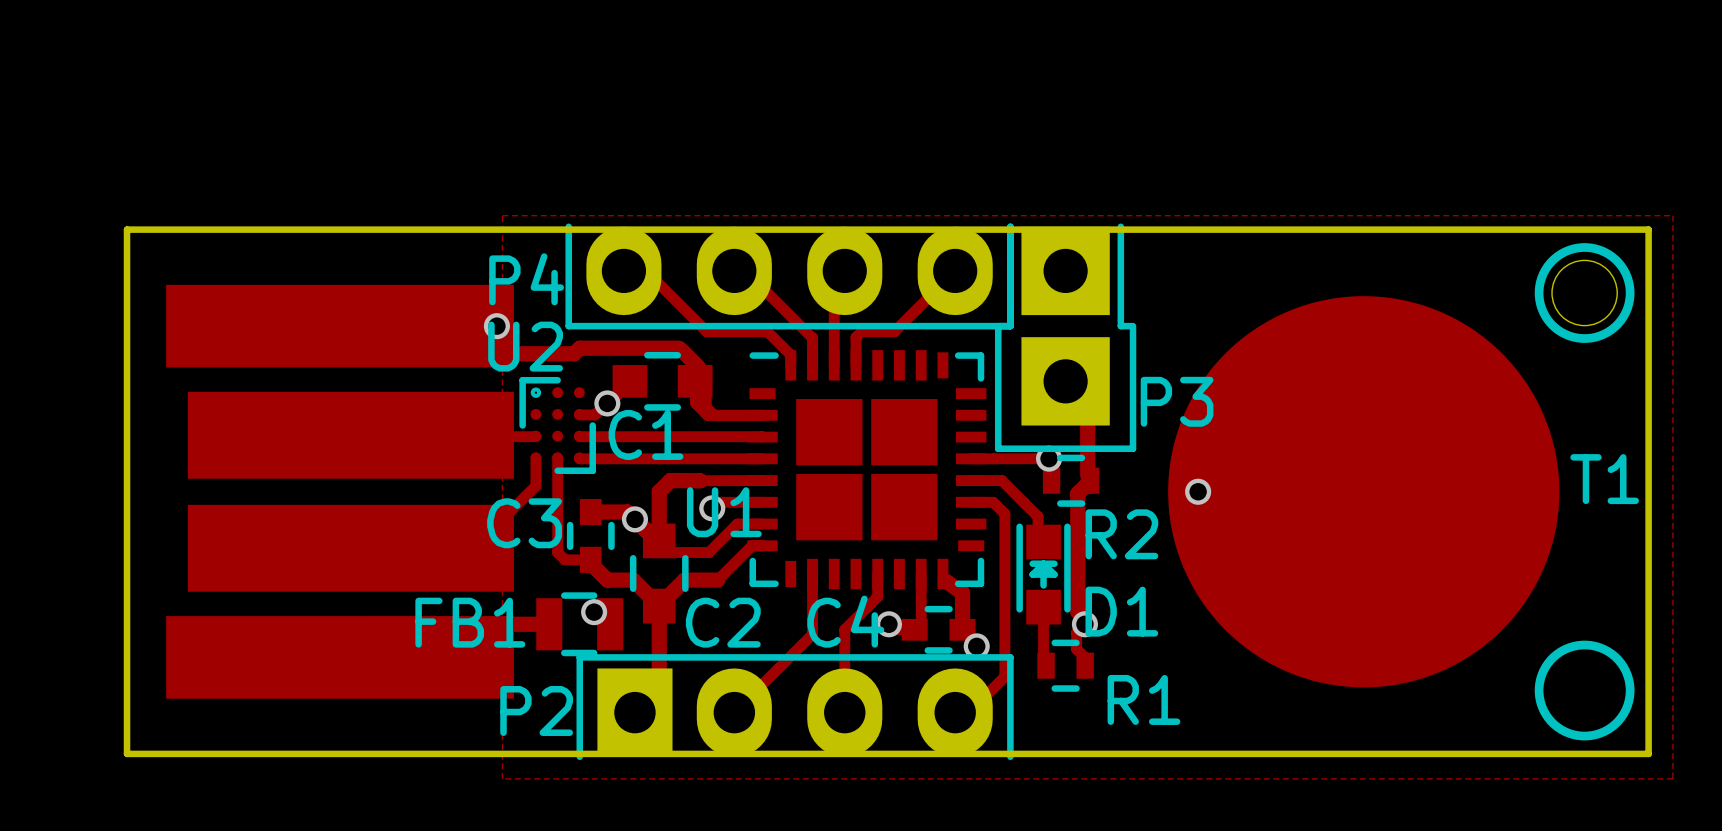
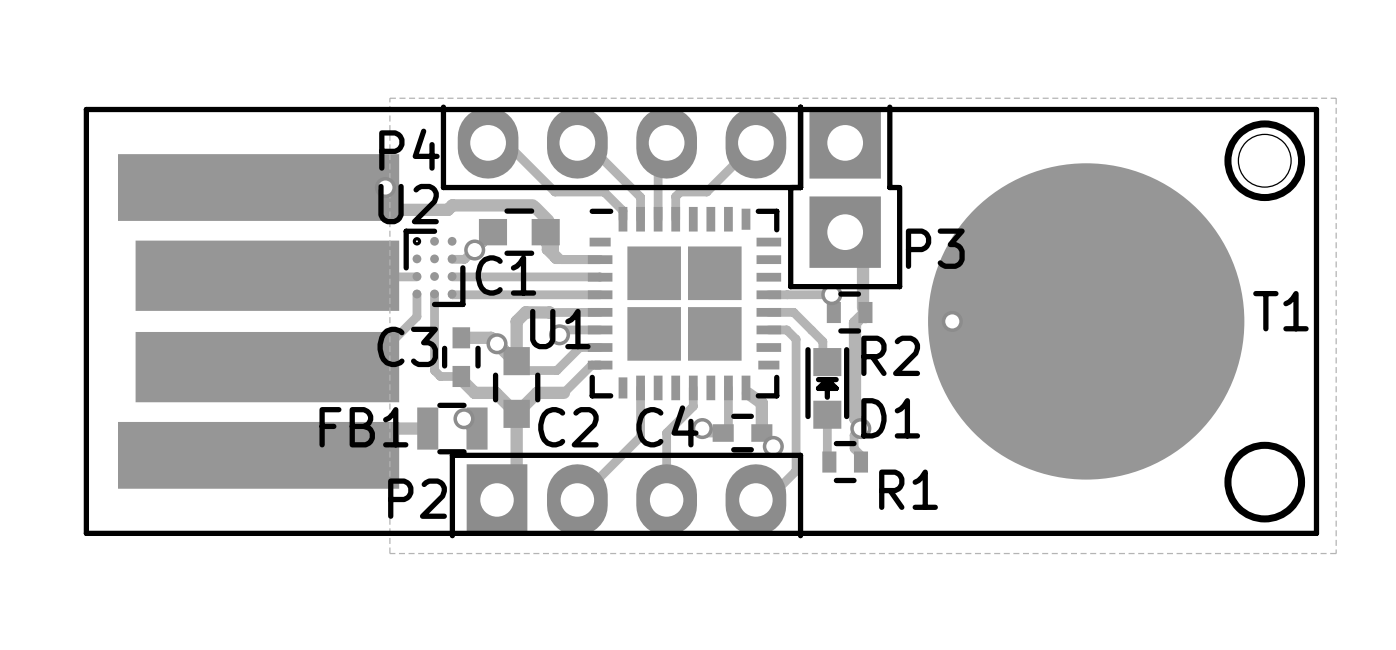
U1 name position: U1 (724, 512) -> U1 (560, 329)

